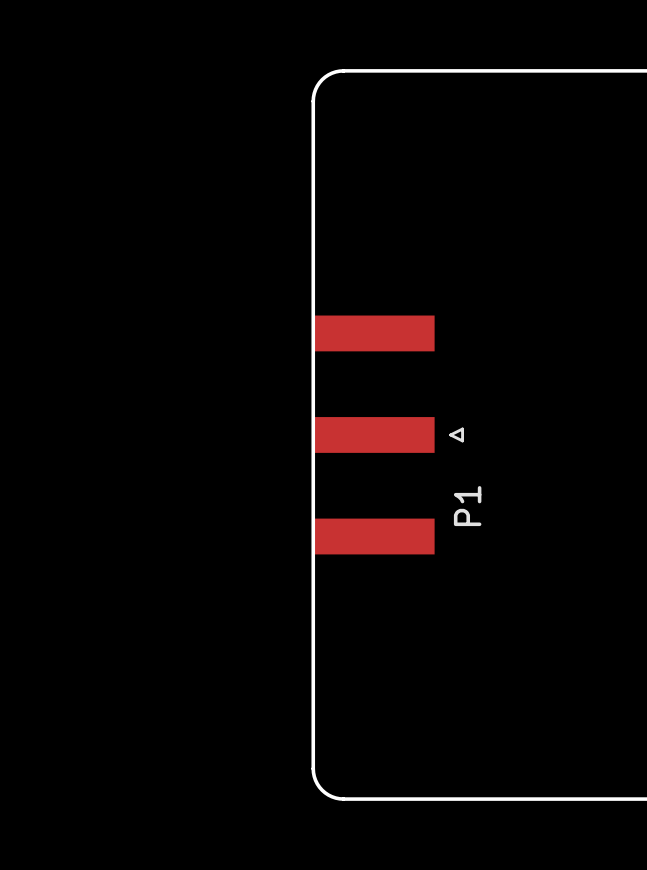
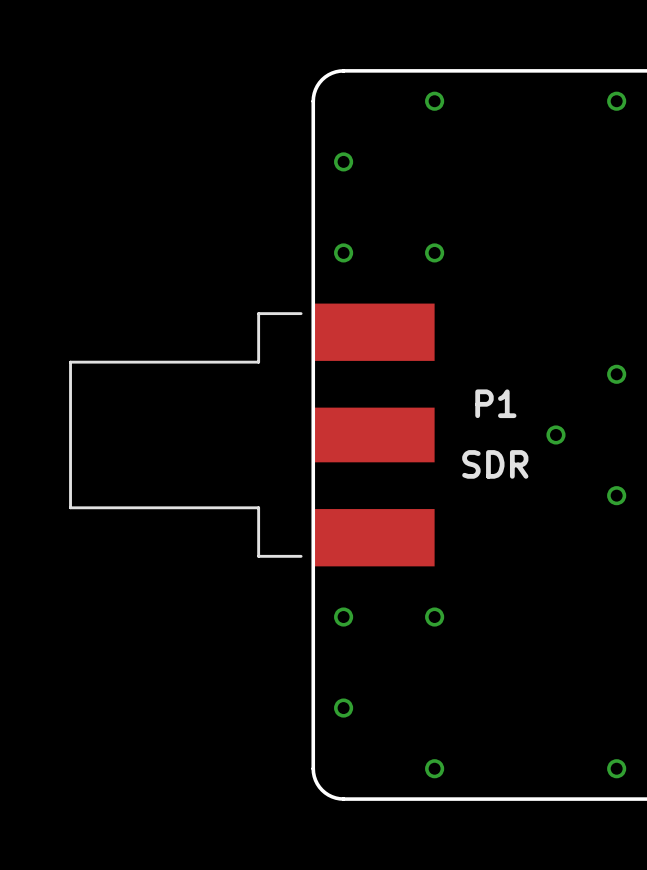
part: none -> (434, 101)
part: none -> (616, 101)
part: none -> (343, 161)
part: none -> (343, 252)
part: none -> (434, 252)
P1 footprint: [313, 315, 465, 555] -> [69, 303, 435, 567]
part: none -> (616, 374)
part: none -> (555, 434)
P1 value: none -> SDR (495, 464)
part: none -> (616, 495)
P1 name position: P1 (467, 506) -> P1 (495, 403)
part: none -> (343, 617)
part: none -> (434, 617)
part: none -> (343, 708)
part: none -> (434, 768)
part: none -> (616, 768)

